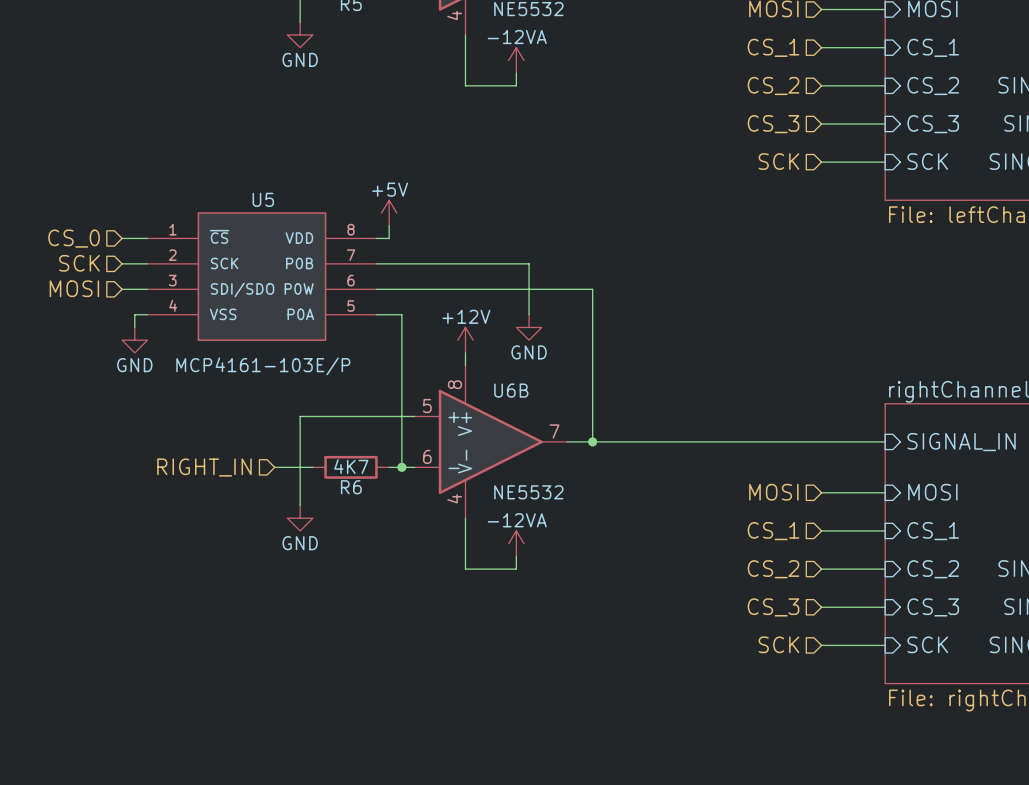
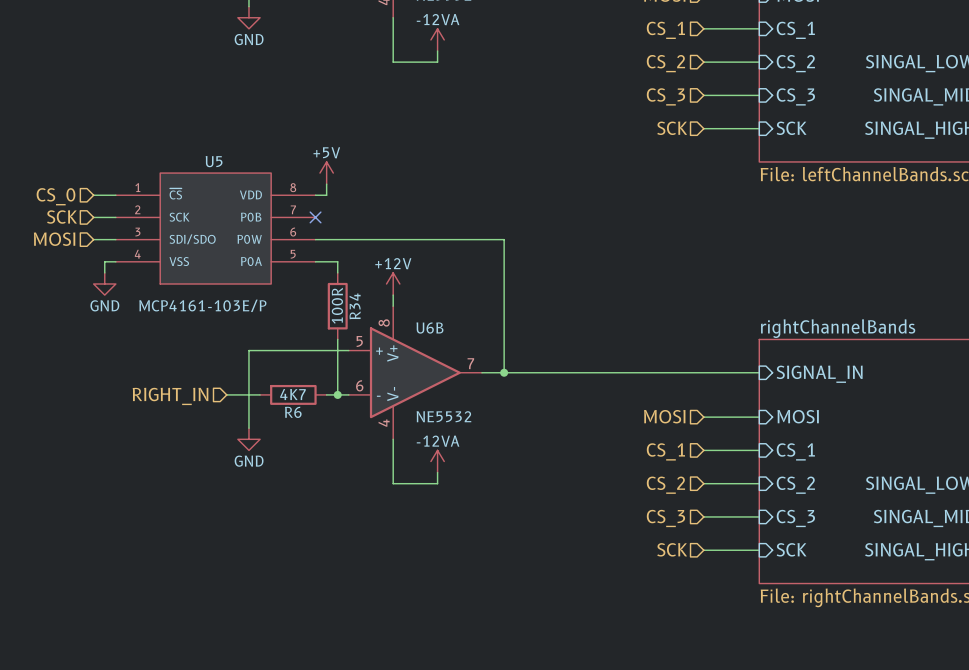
wire: (376, 263) (529, 263) (529, 314) -> none
no-connect mark: none -> (315, 217)
power symbol: GND (529, 327) -> none
R34: none -> 100R (337, 306)

